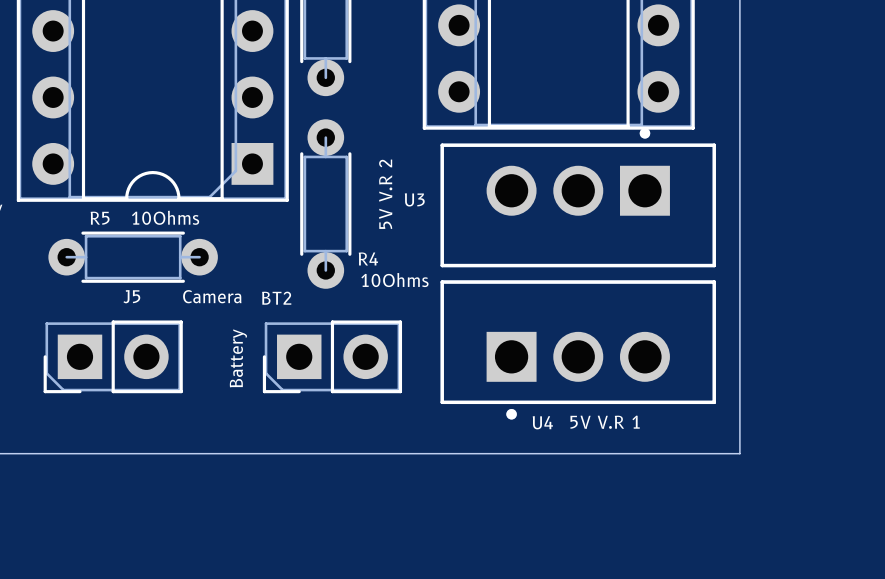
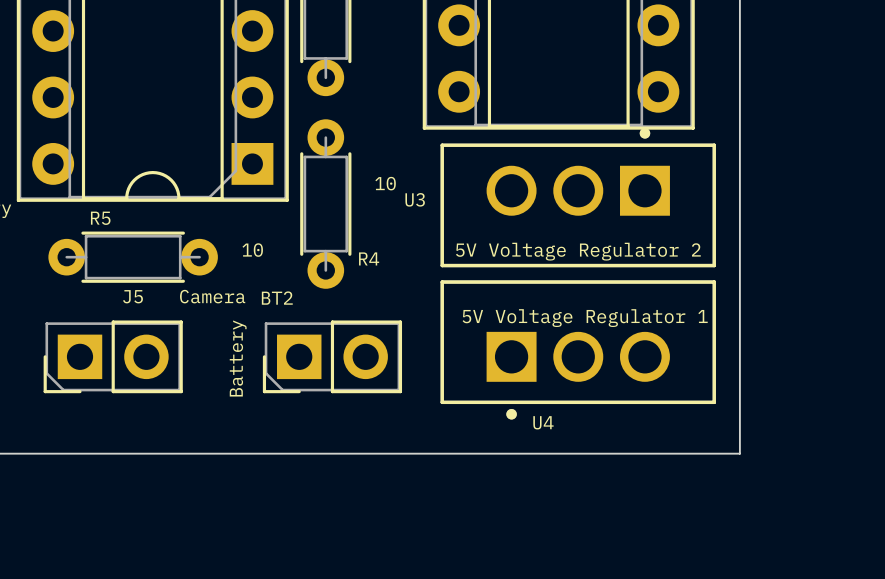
U3 value: 5V V.R 2 (385, 194) -> 5V Voltage Regulator 2 (578, 251)
R5 value: 10Ohms (165, 217) -> 10 (252, 250)
R4 value: 10Ohms (394, 280) -> 10 (385, 183)
U4 value: 5V V.R 1 (605, 422) -> 5V Voltage Regulator 1 (585, 318)

